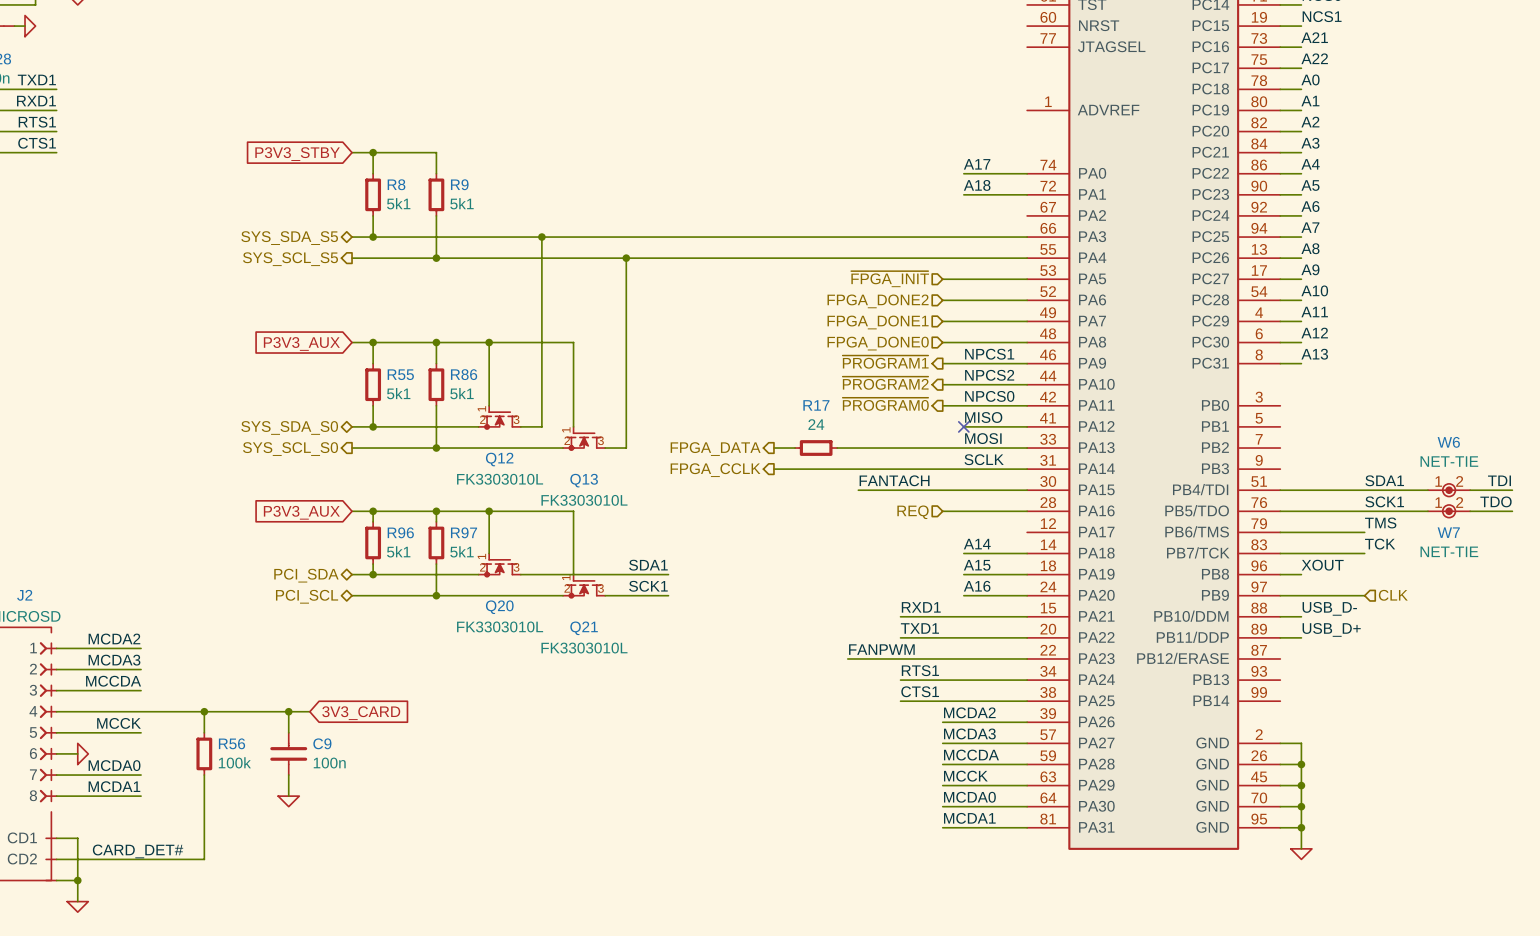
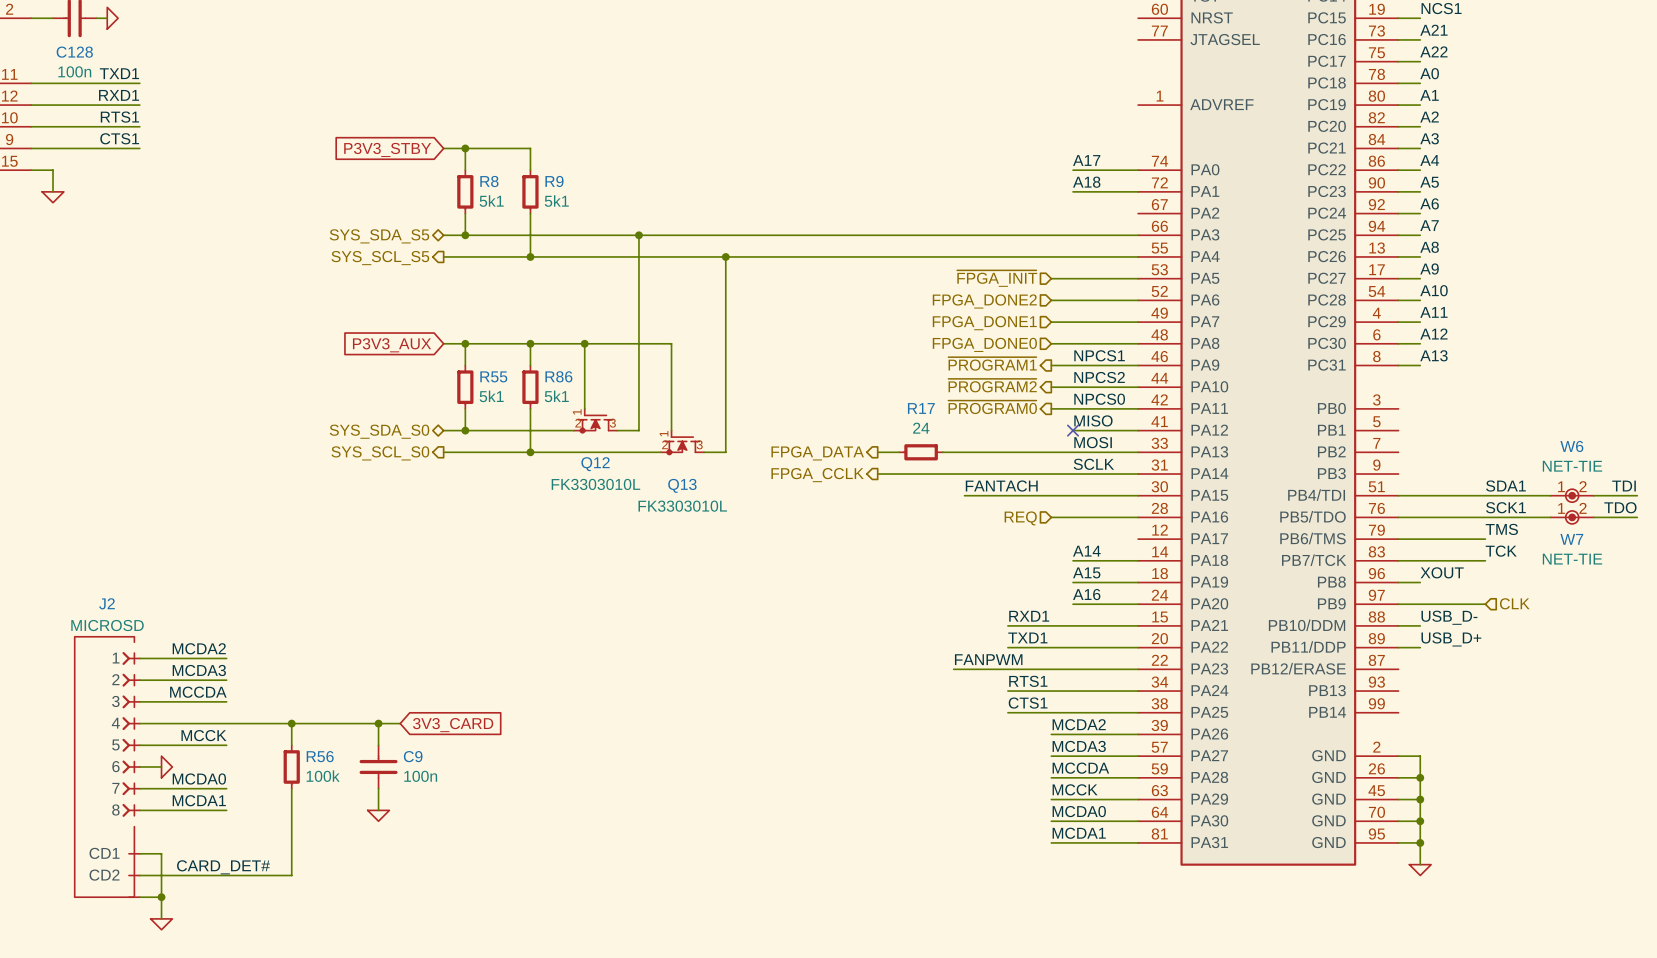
wire: (352, 511) (573, 511) (573, 574) -> none
wire: (373, 511) (373, 521) -> none
junction: (373, 511) -> none
wire: (436, 511) (436, 521) -> none
junction: (436, 511) -> none
wire: (489, 511) (489, 553) -> none
junction: (489, 511) -> none
global label: P3V3_AUX (301, 512) -> none
R96: 5k1 (373, 542) -> none
R97: 5k1 (436, 542) -> none
wire: (373, 564) (373, 574) -> none
wire: (436, 564) (436, 595) -> none
Q20: FK3303010L (499, 565) -> none
label: SDA1 (648, 565) -> none
wire: (352, 574) (478, 574) -> none
junction: (373, 574) -> none
wire: (520, 574) (668, 574) -> none
hierarchical label: PCI_SDA (306, 575) -> none
Q21: FK3303010L (584, 586) -> none
label: SCK1 (648, 586) -> none
wire: (352, 595) (563, 595) -> none
junction: (436, 595) -> none
wire: (605, 595) (668, 595) -> none
hierarchical label: PCI_SCL (307, 596) -> none

